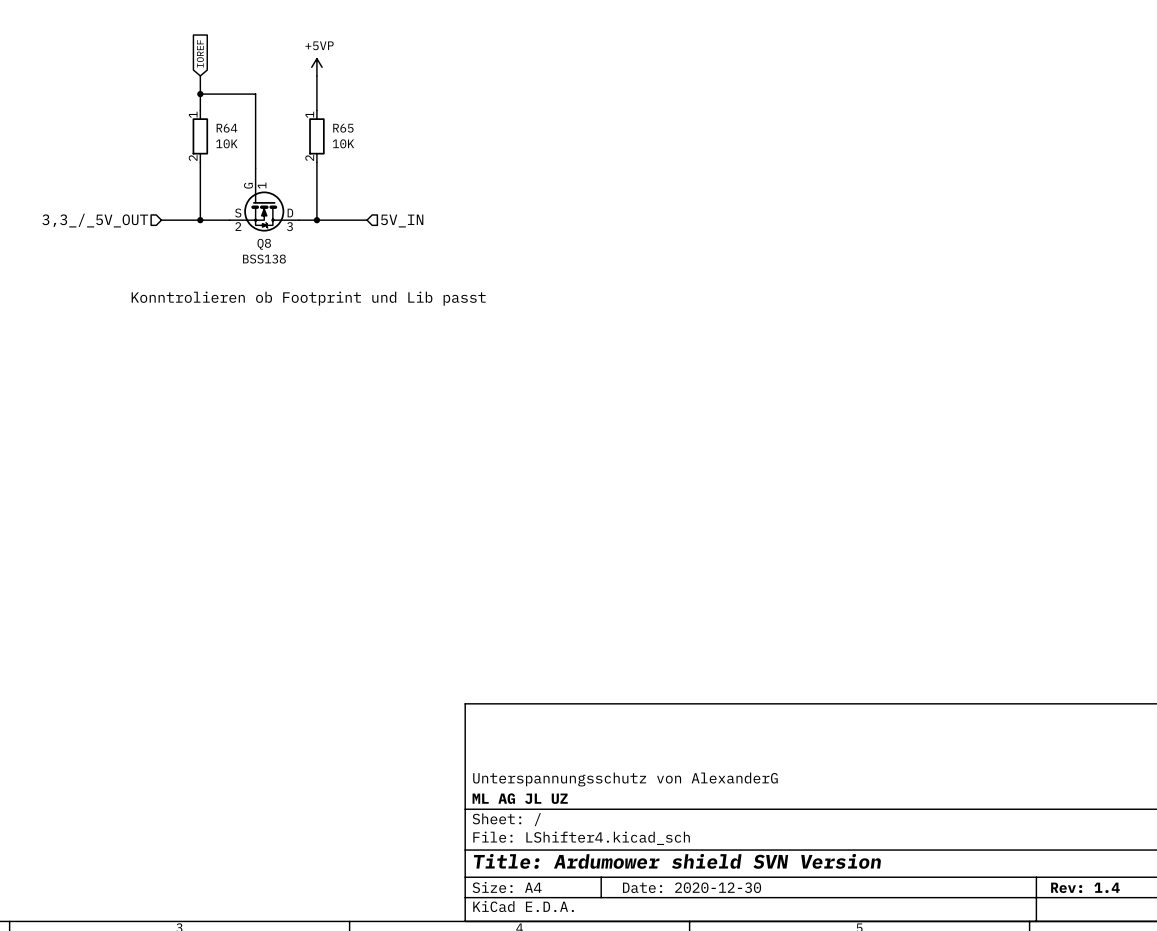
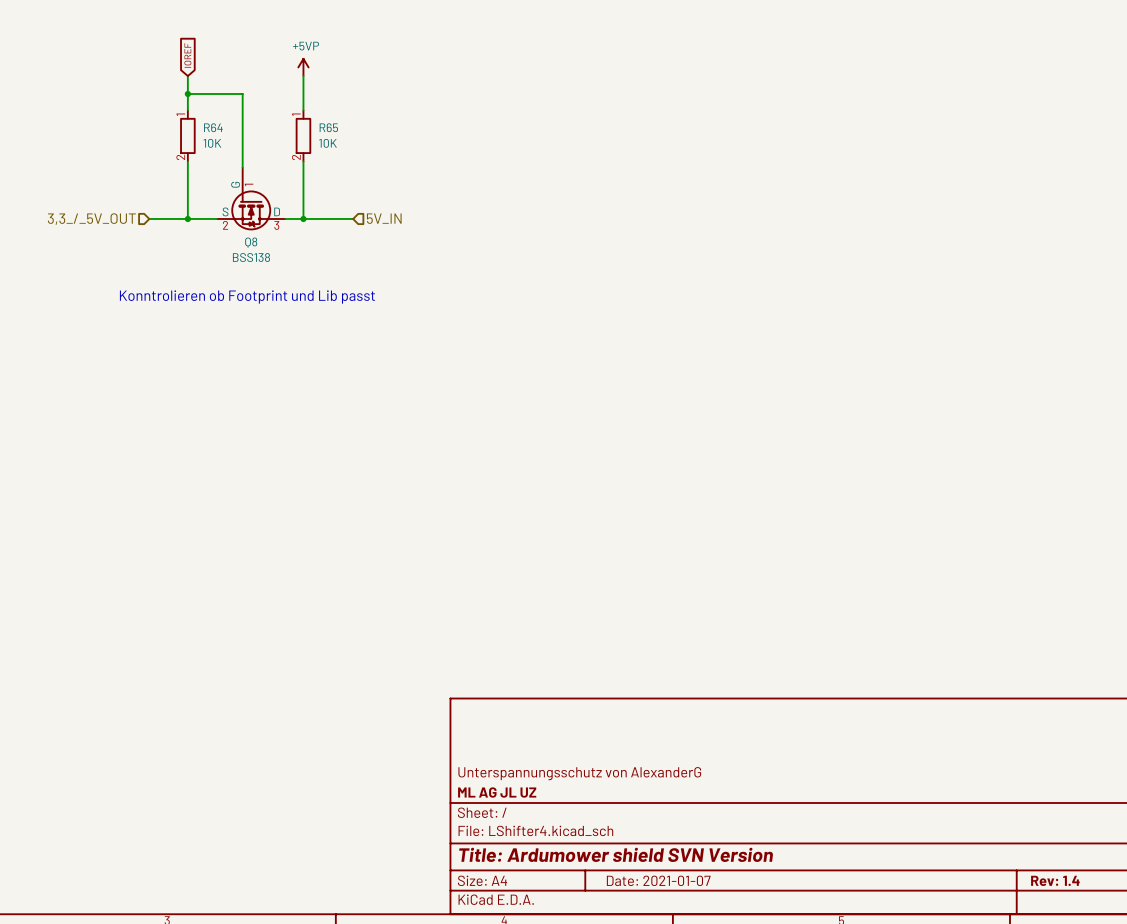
title block: Date: 2020-12-30 (692, 887) -> Date: 2021-01-07 (658, 880)

